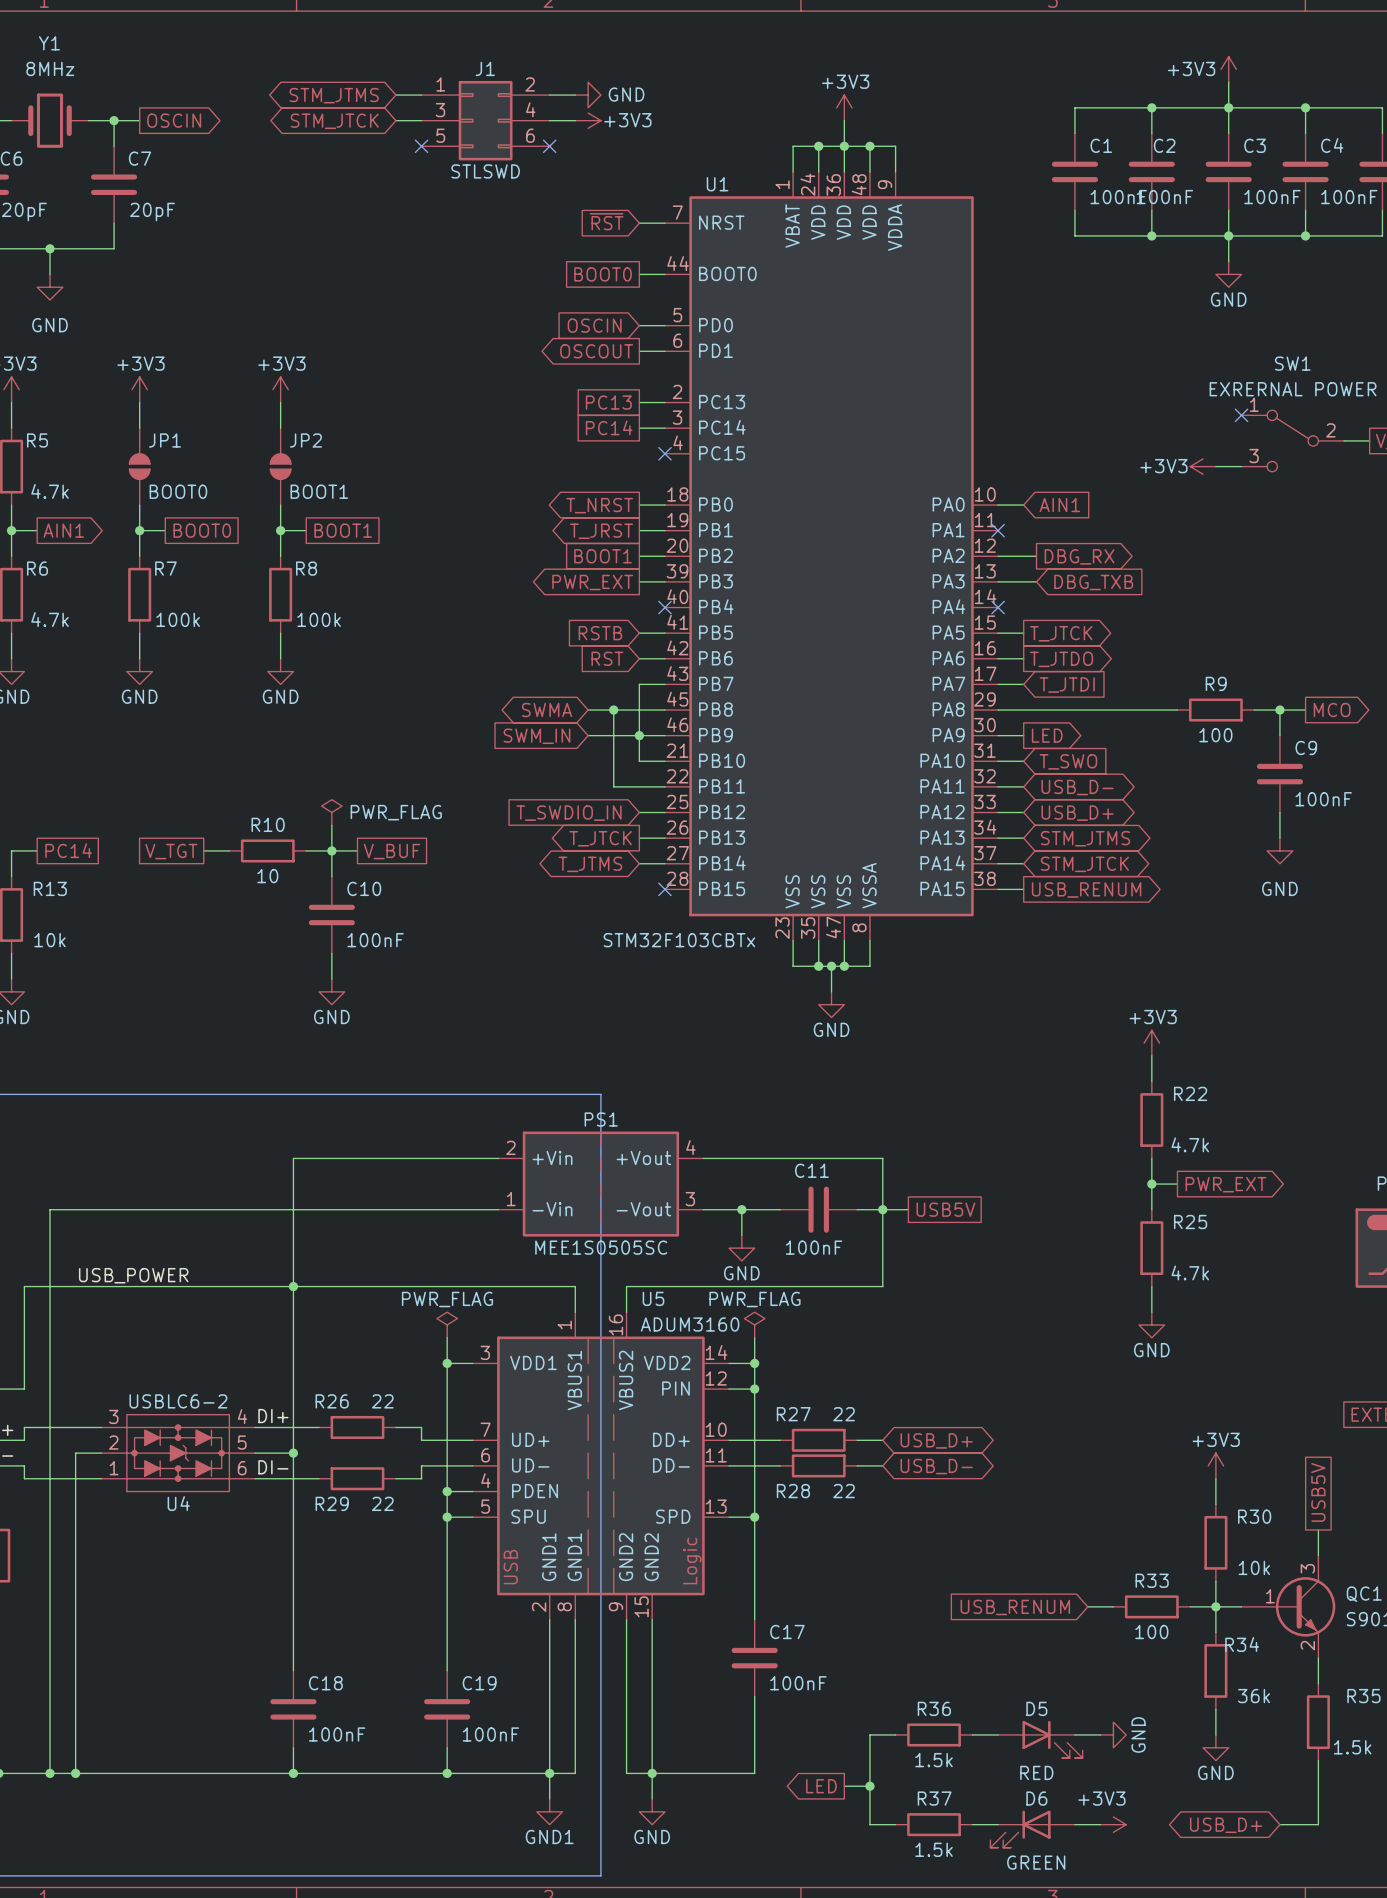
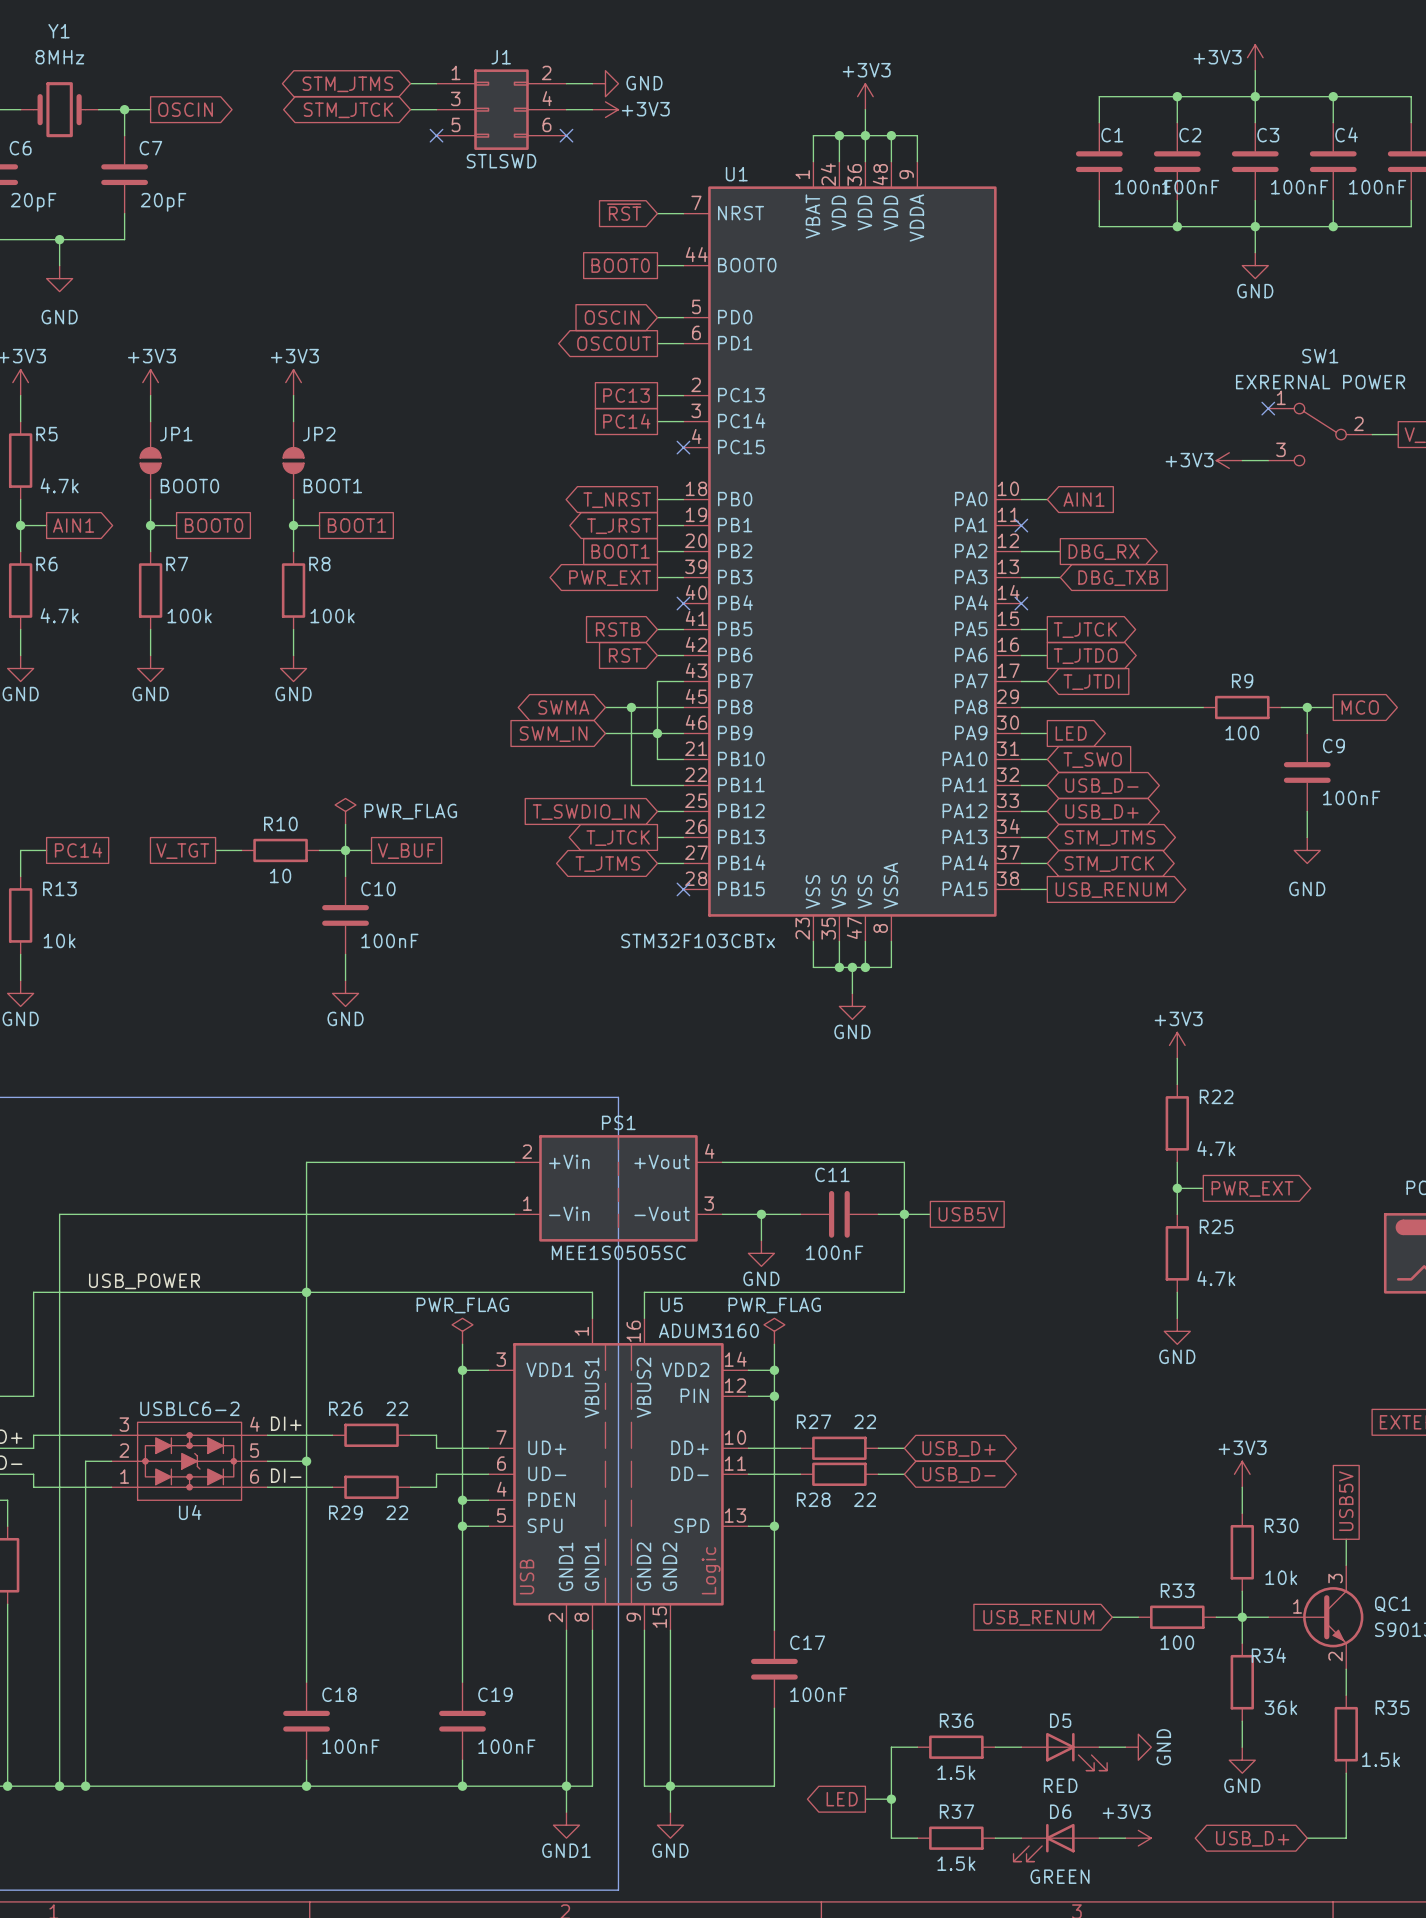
C1 name position: C1 (1101, 145) -> C1 (1112, 135)
C3 name position: C3 (1255, 145) -> C3 (1268, 135)
C4 name position: C4 (1332, 145) -> C4 (1346, 134)

